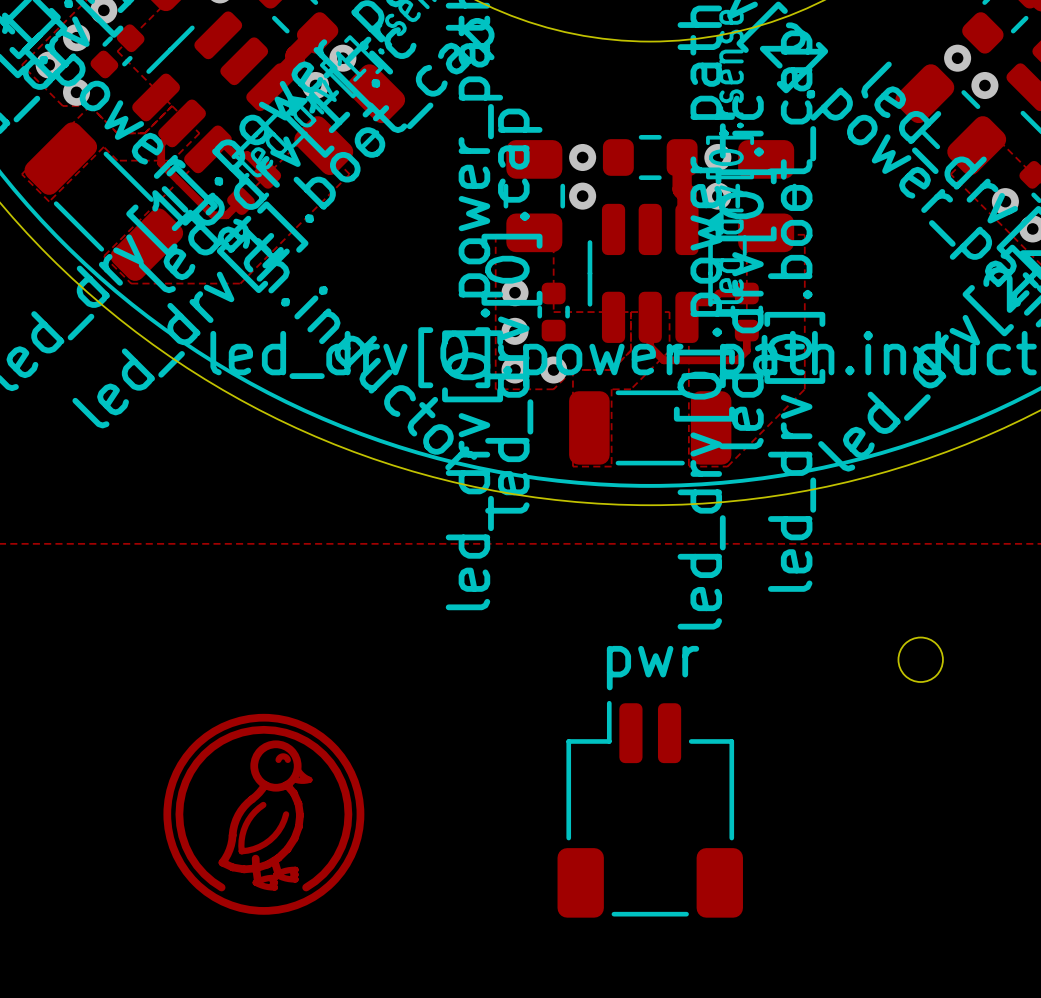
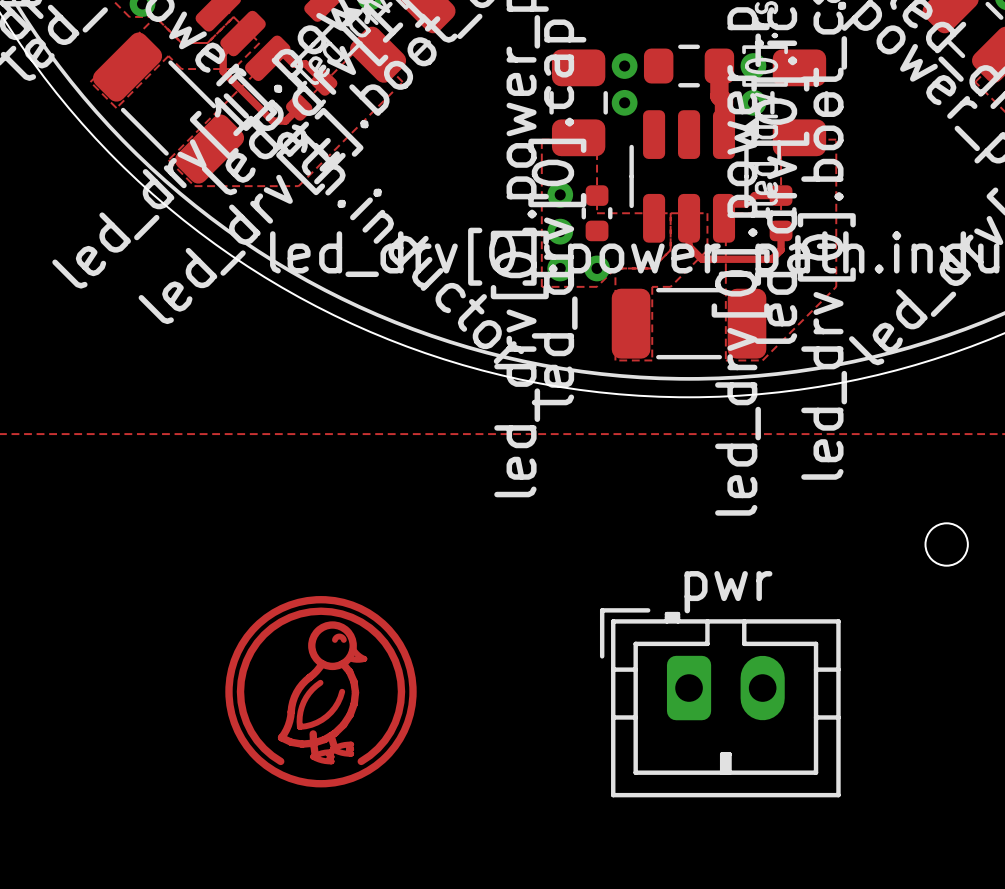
pwr footprint: [557, 700, 743, 918] -> [599, 608, 841, 798]

